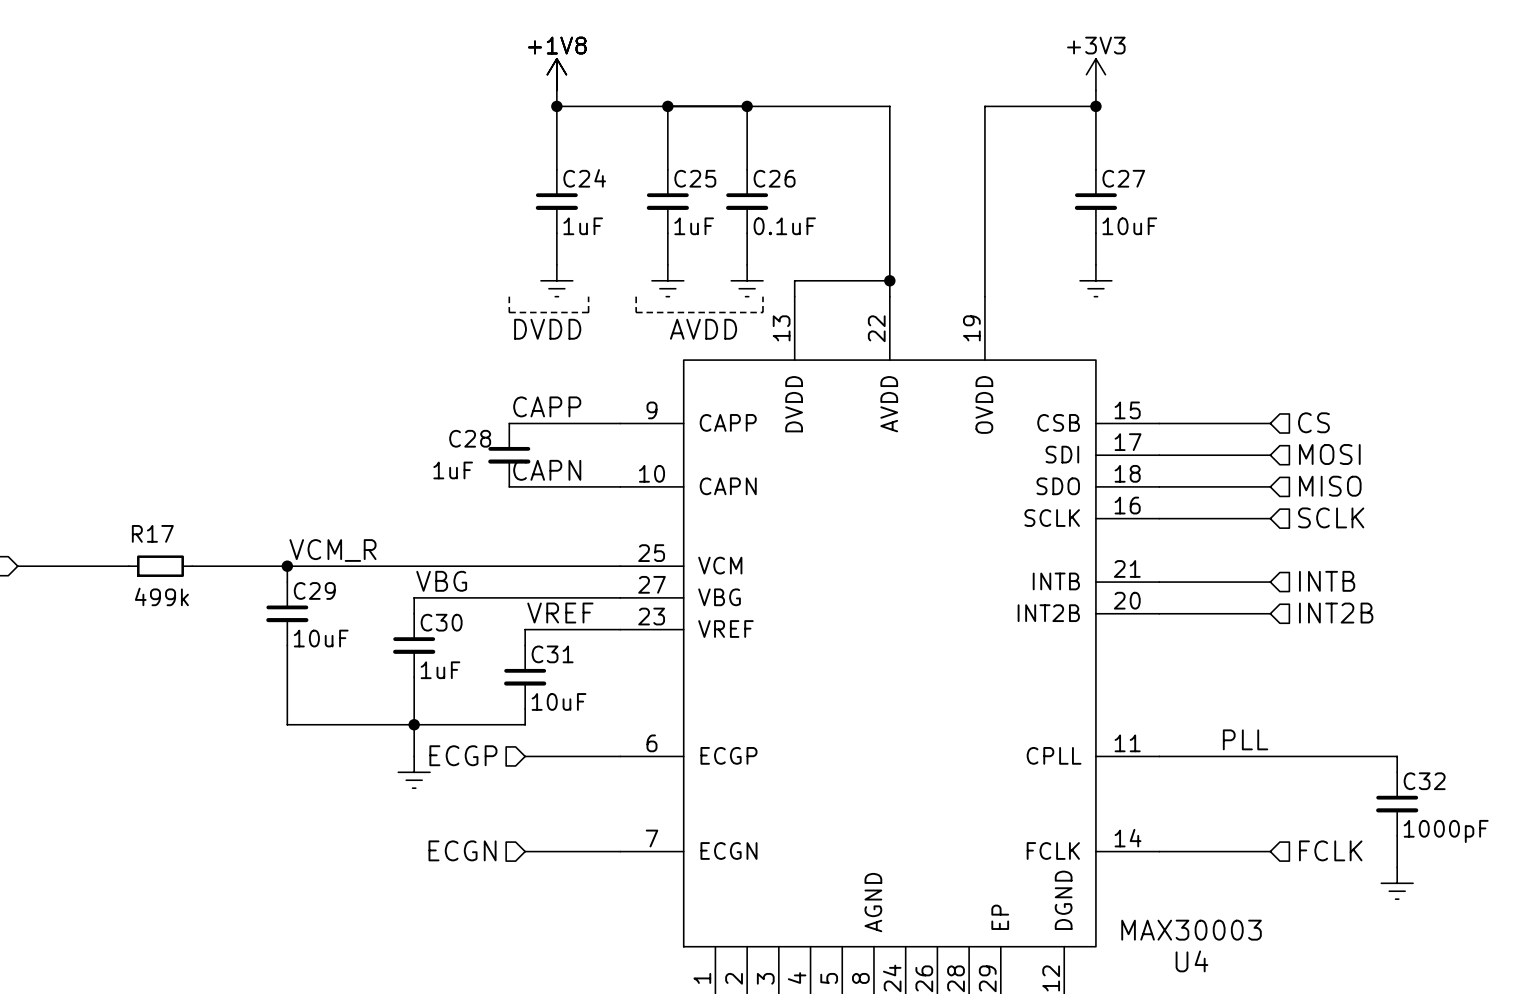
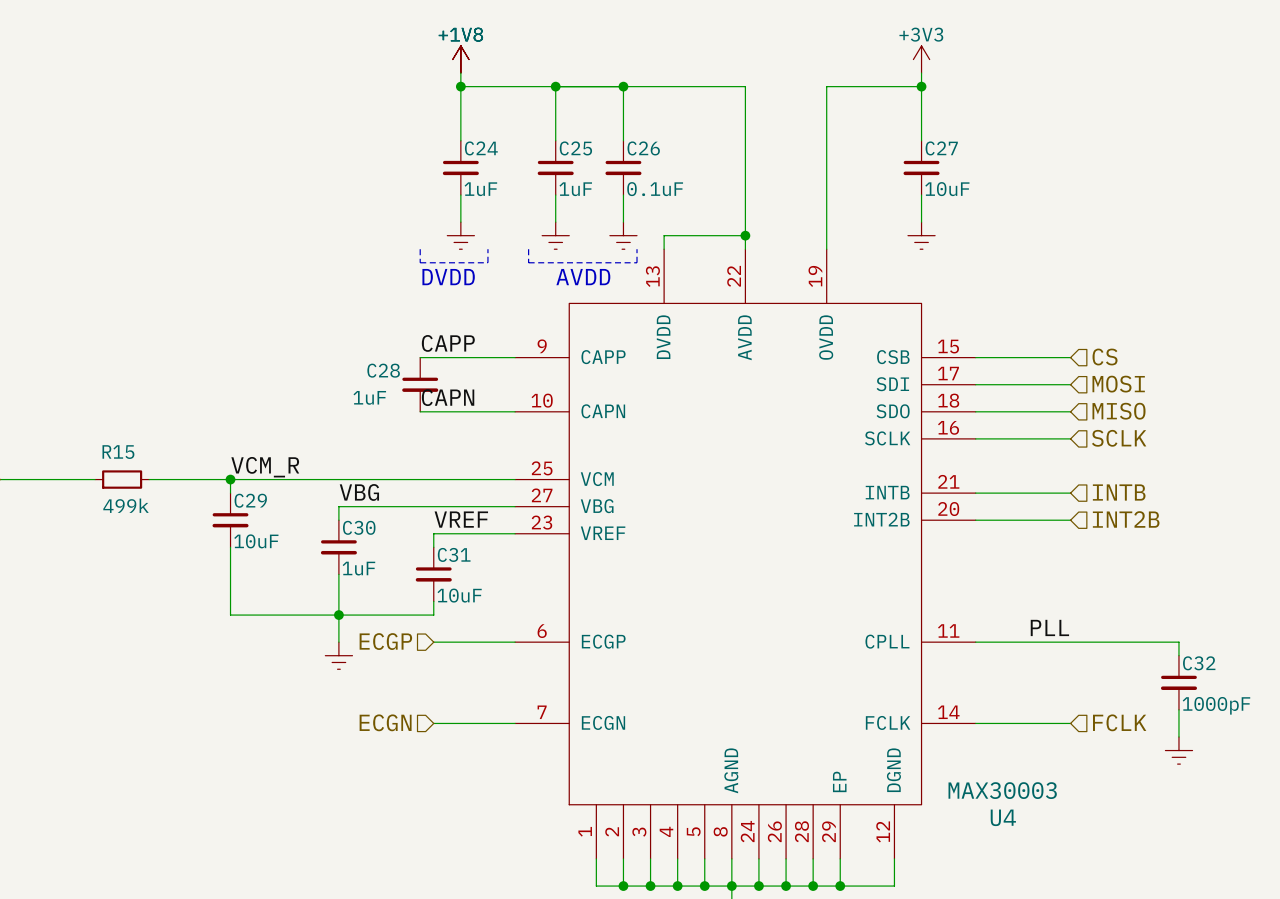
R17 name: R17 (152, 533) -> R15 (118, 452)

